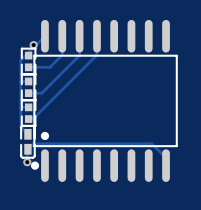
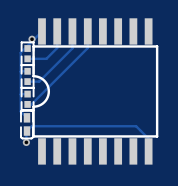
part footprint: [30, 19, 178, 182] -> [32, 18, 159, 165]

